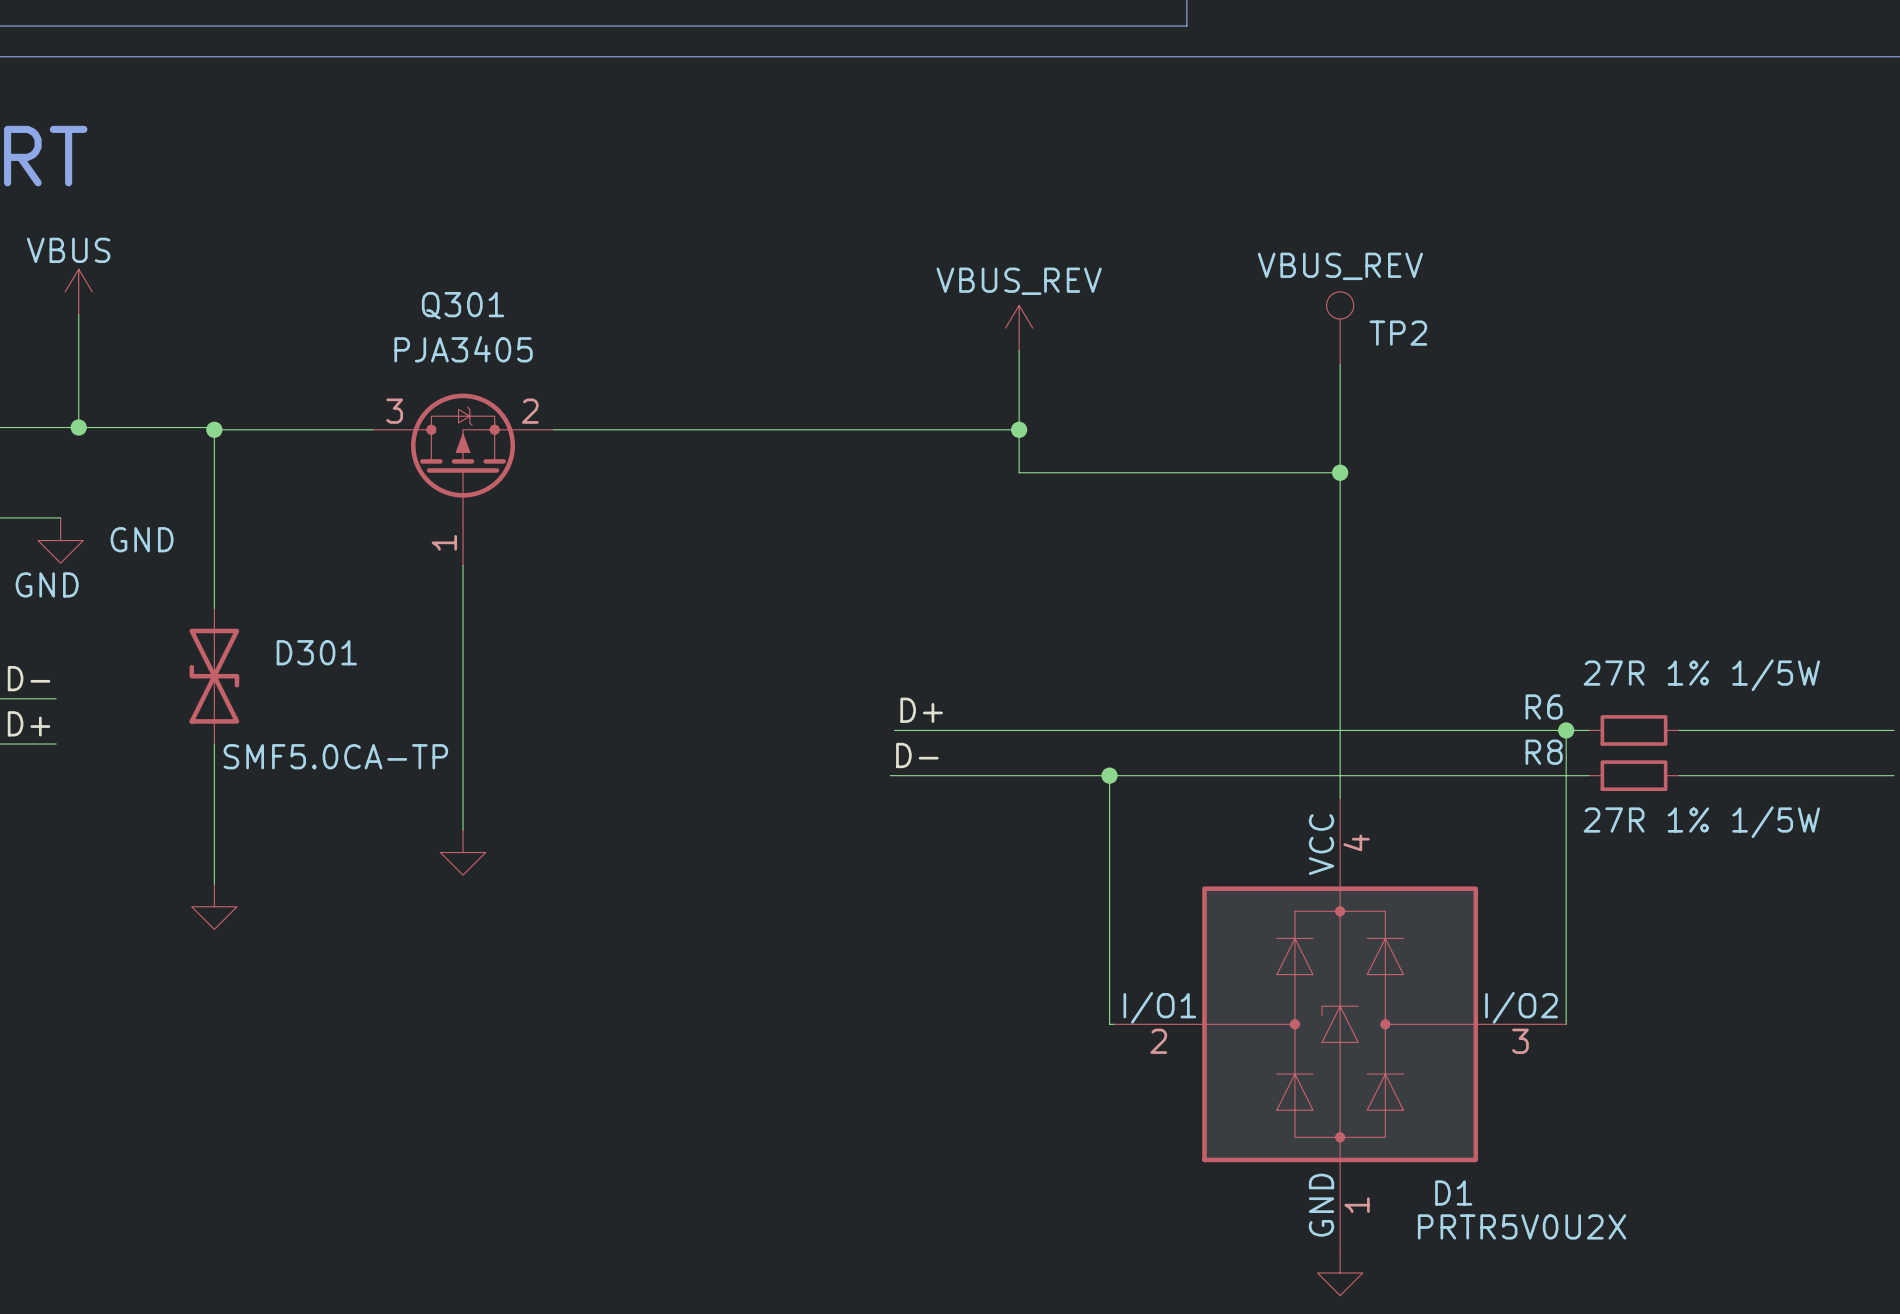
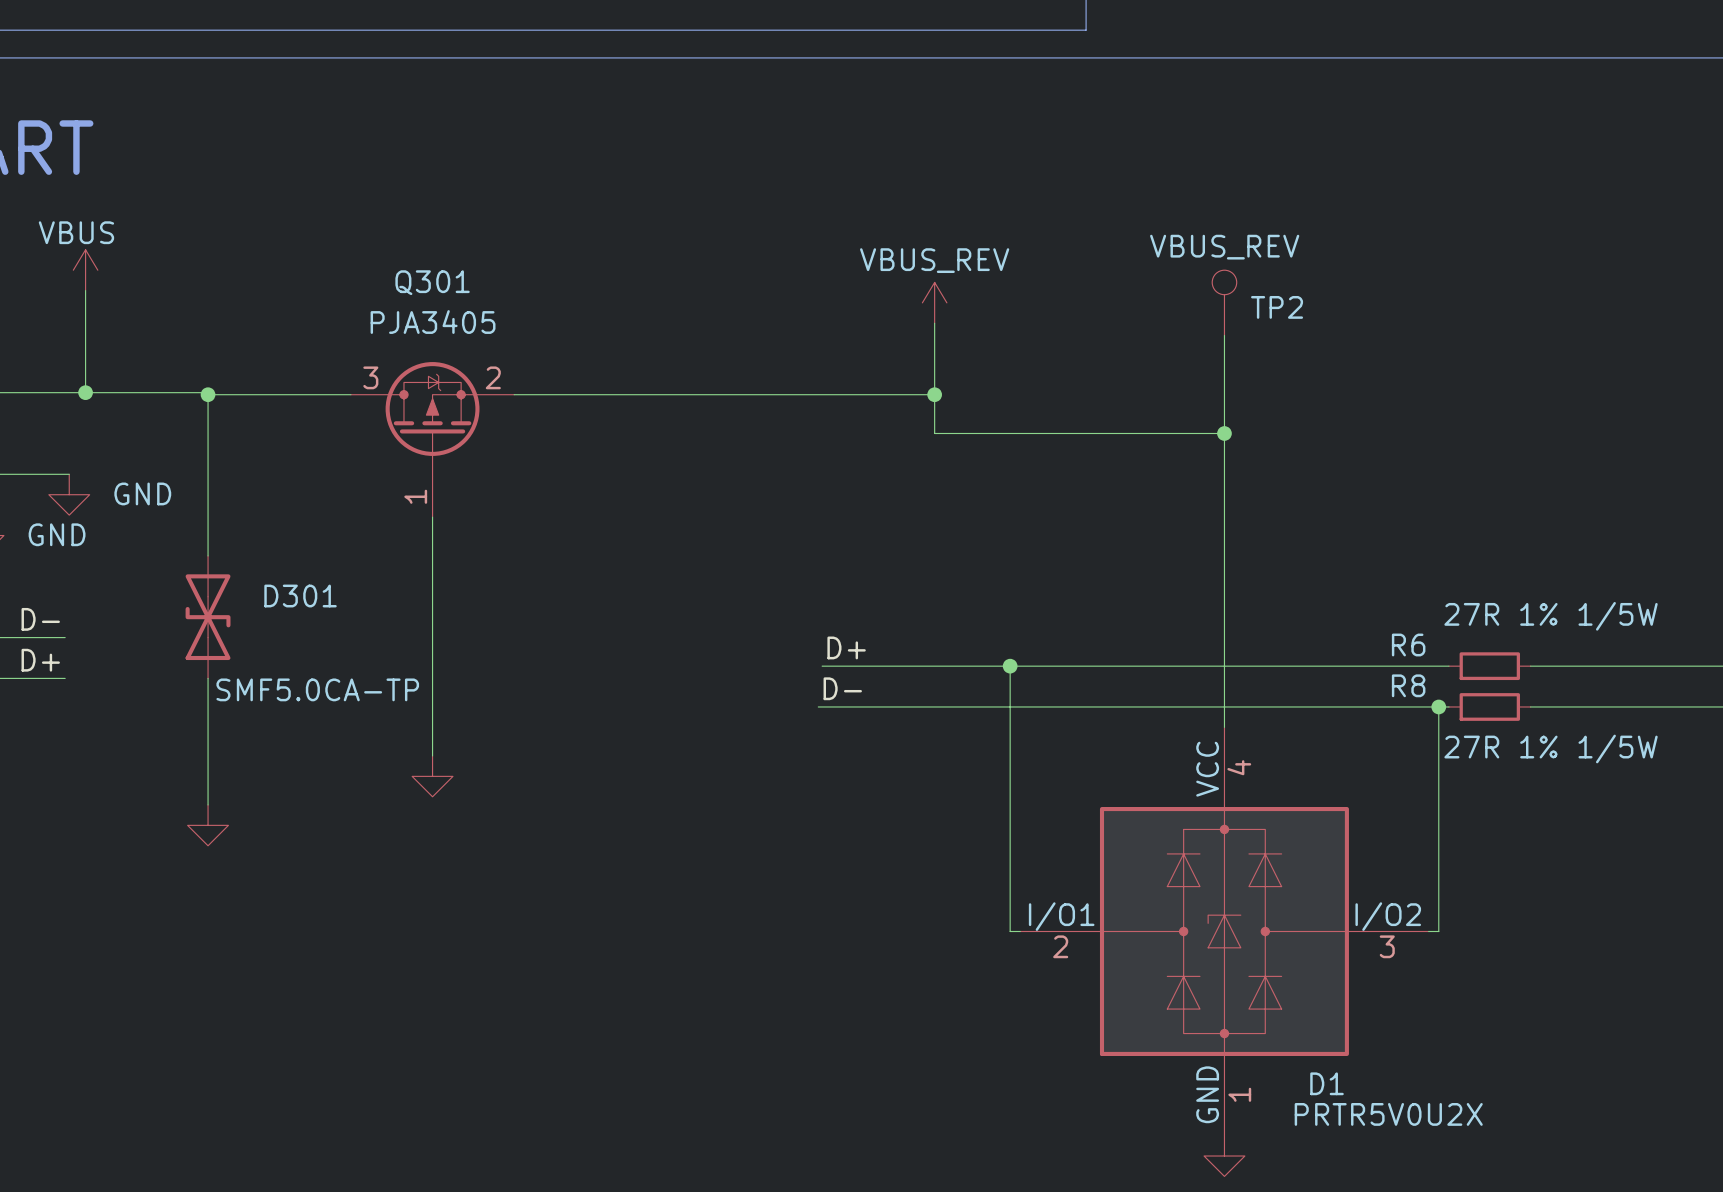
wire: (1566, 730) (1566, 1024) -> (1438, 706) (1438, 931) (1428, 931)
junction position: (1566, 730) -> (1438, 706)
wire: (1109, 775) (1109, 1024) -> (1010, 666) (1010, 931) (1016, 931)
junction position: (1109, 775) -> (1010, 666)

